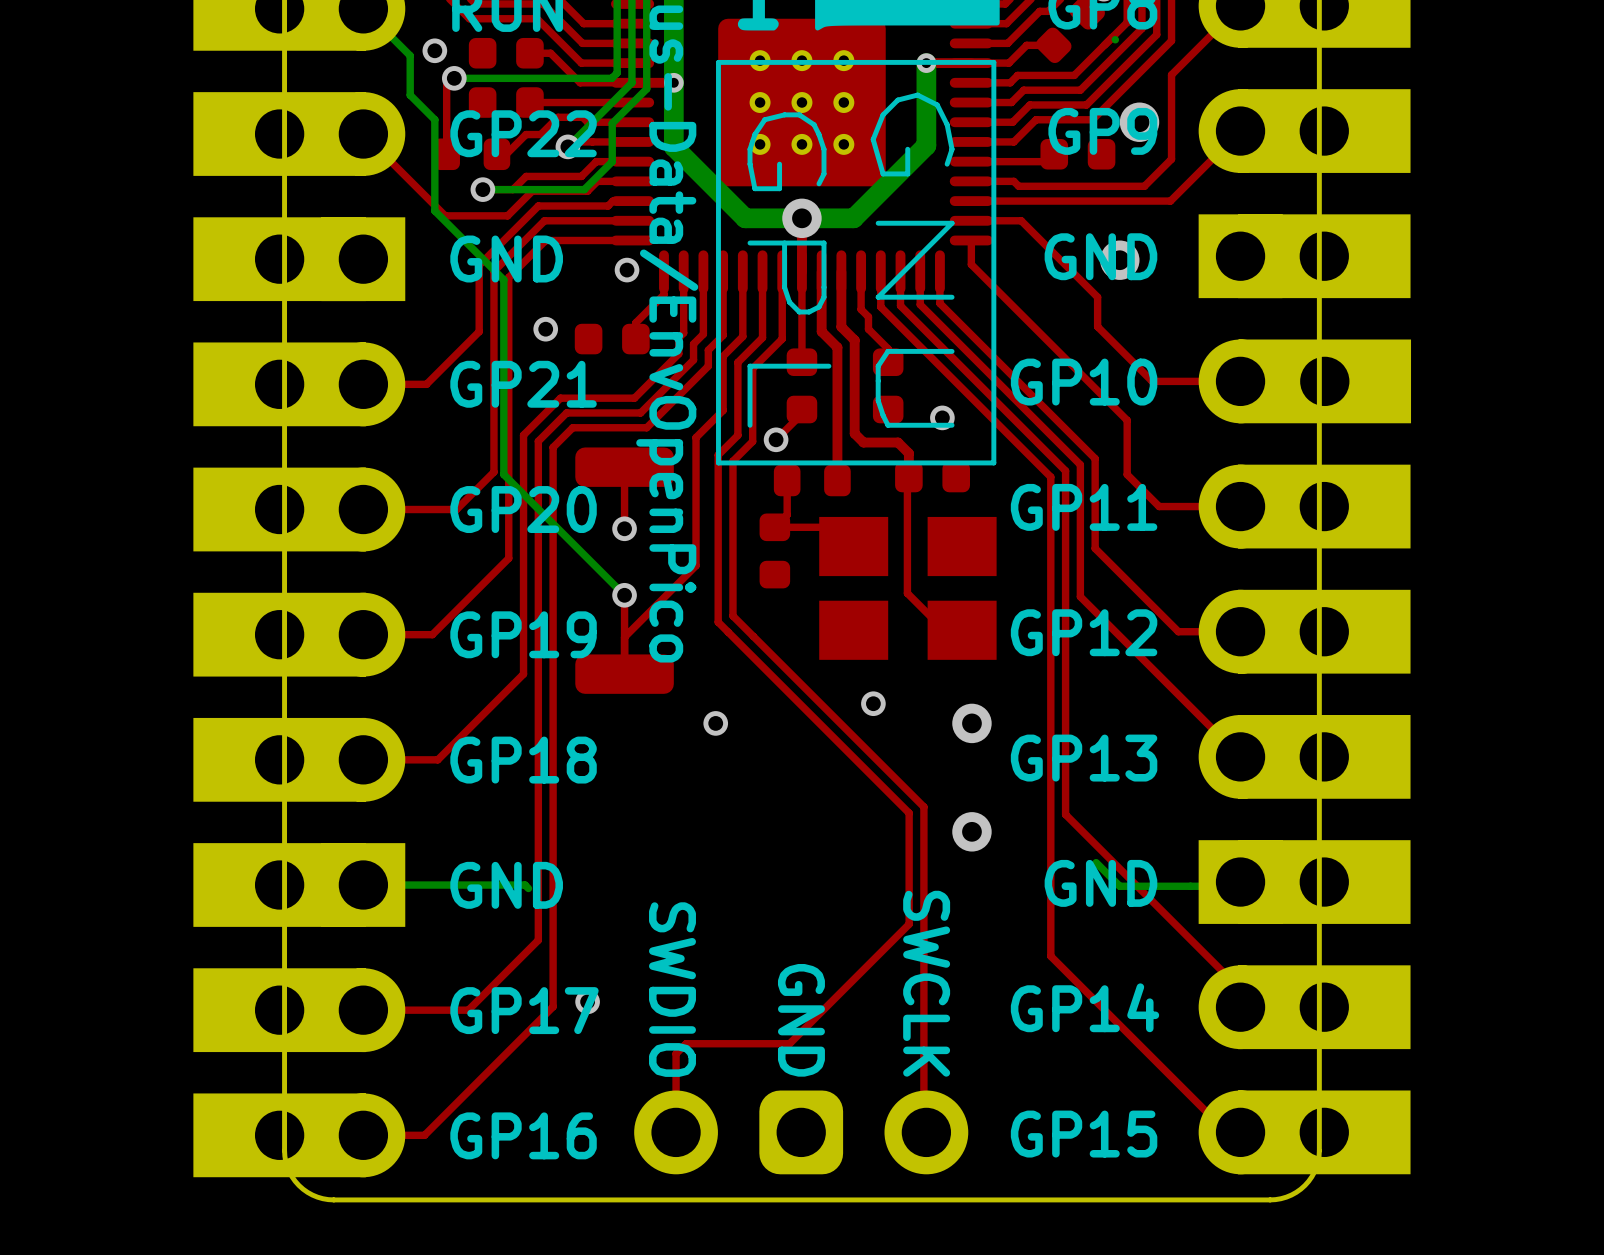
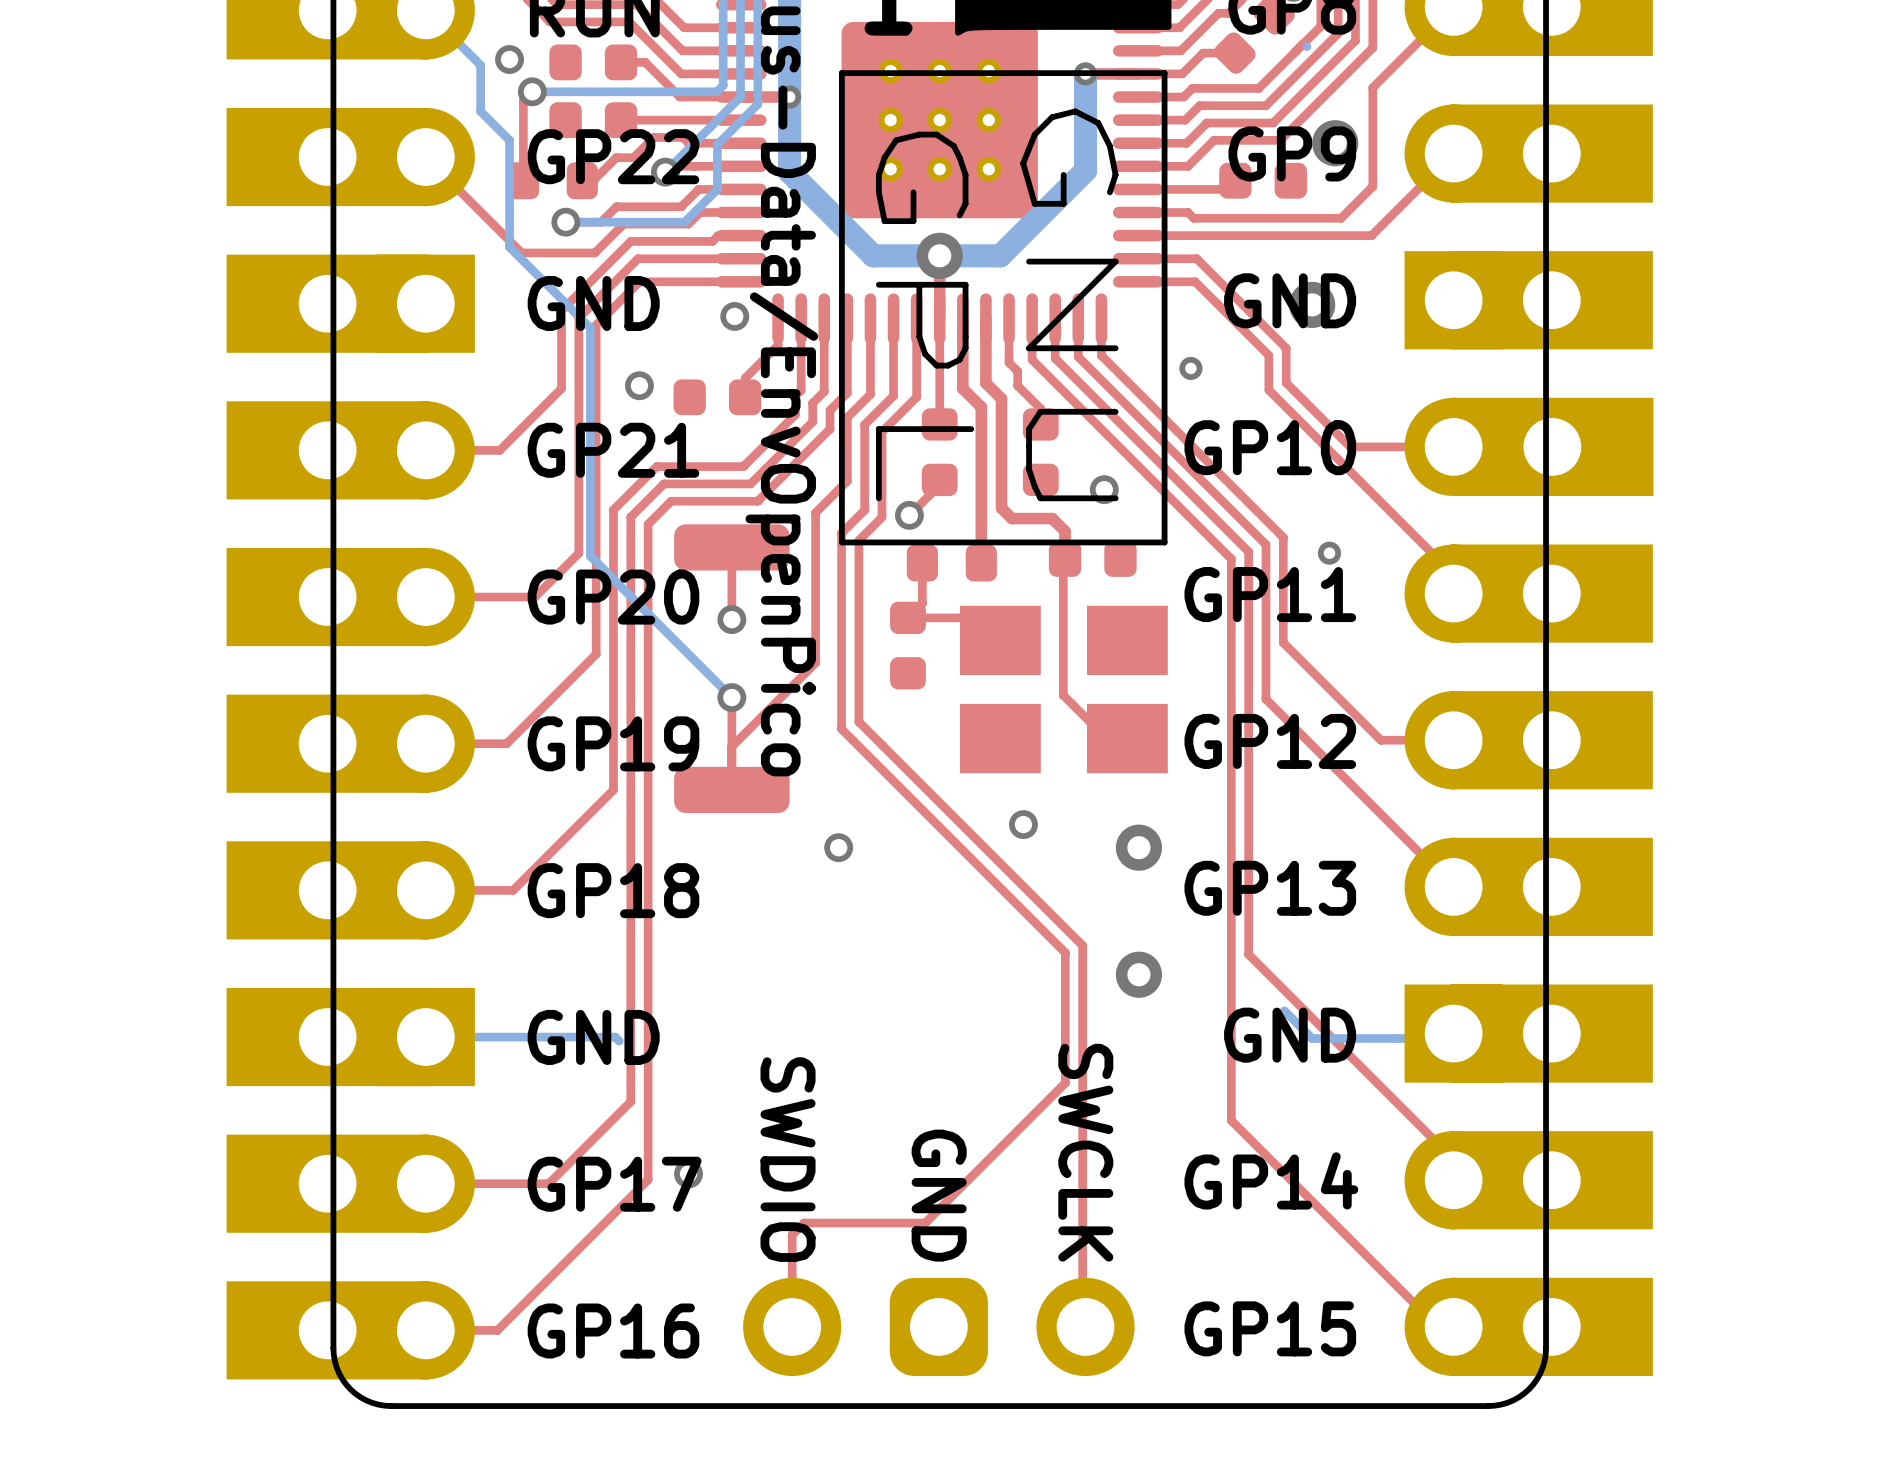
top track: (971, 240) (971, 264) (1127, 420) (1127, 474) (1159, 506) (1240, 506) -> (1138, 281) (1195, 281) (1268, 355) (1268, 390) (1453, 574) (1453, 593)
via: none -> (1190, 368)
via: none -> (1329, 553)

